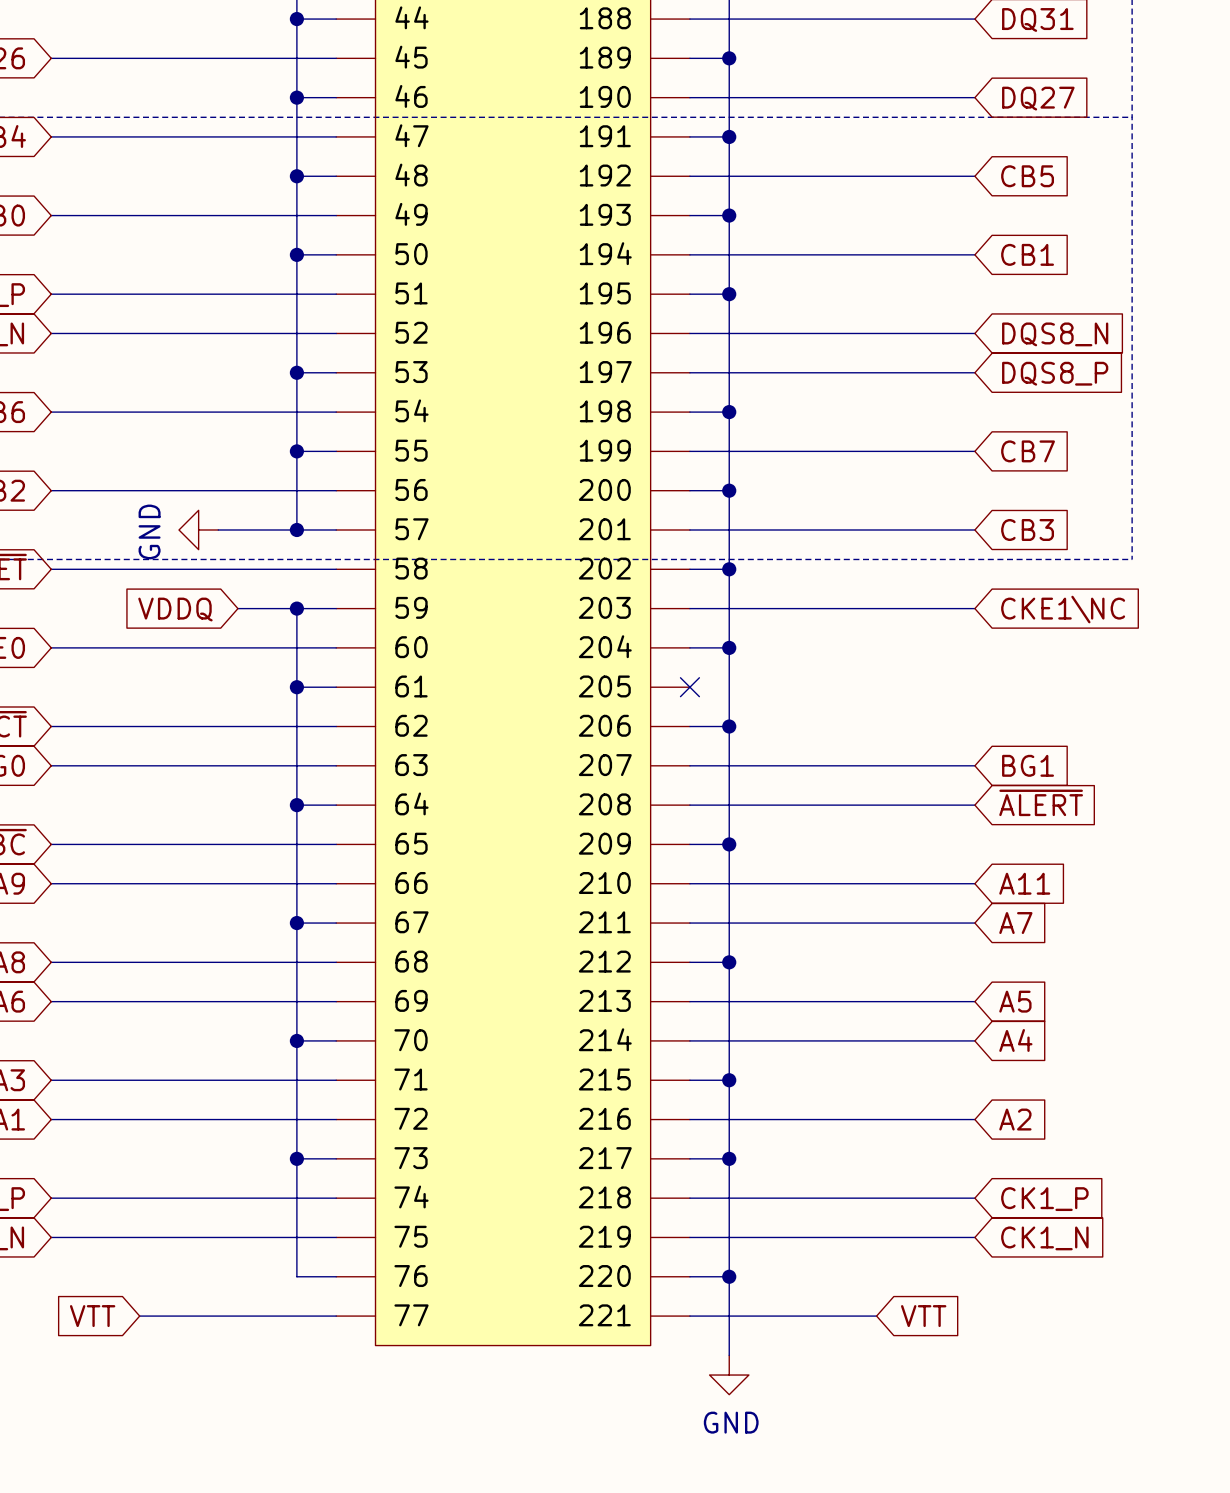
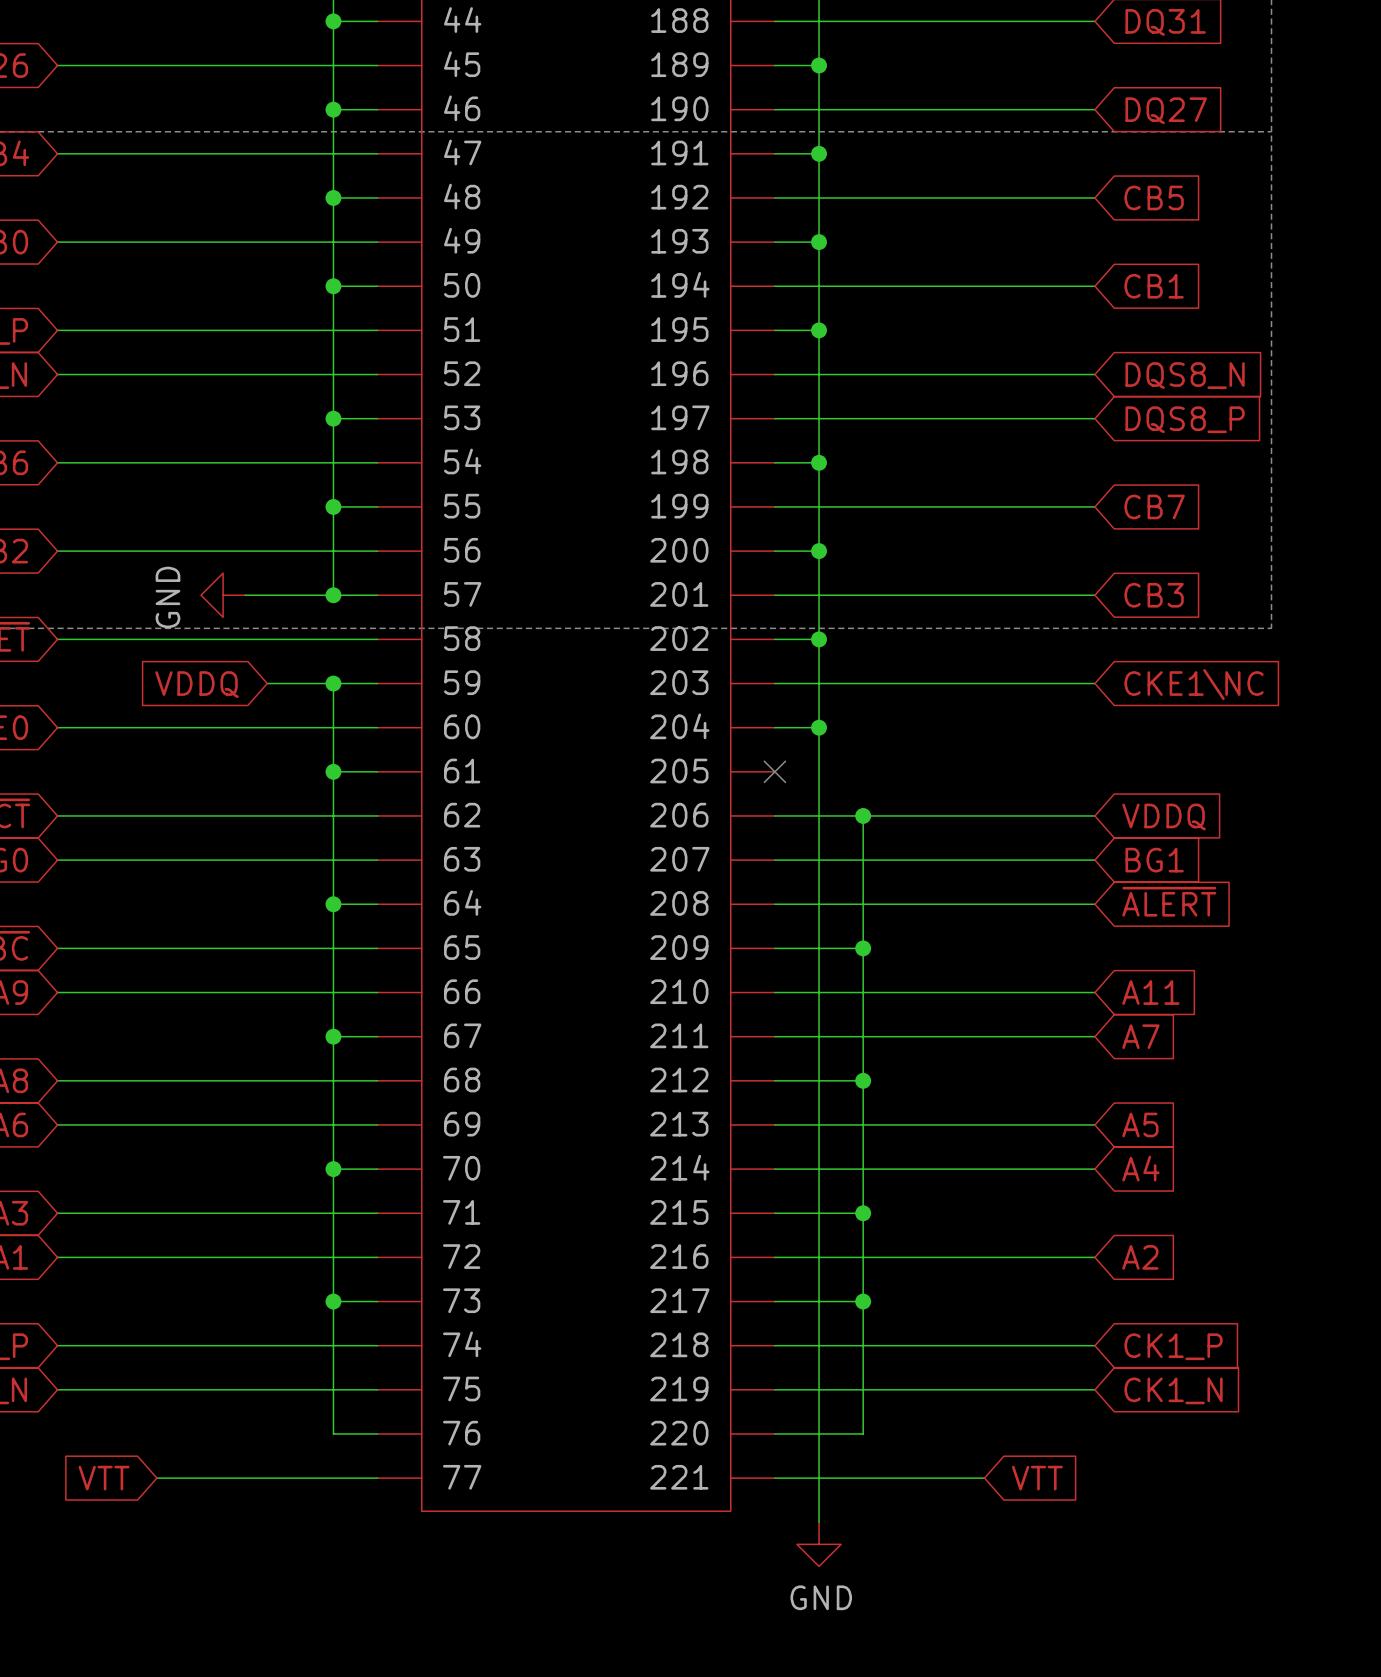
wire: none -> (819, 815) (1094, 815)
junction position: (729, 726) -> (863, 815)
wire: none -> (863, 815) (863, 1433) (819, 1433)
global label: none -> VDDQ (1164, 817)
wire: none -> (819, 948) (863, 948)
junction position: (729, 844) -> (863, 948)
wire: none -> (819, 1080) (863, 1080)
junction position: (729, 962) -> (863, 1080)
wire: none -> (819, 1213) (863, 1213)
junction position: (729, 1080) -> (863, 1213)
wire: none -> (819, 1301) (863, 1301)
junction position: (729, 1158) -> (863, 1301)
junction: (729, 1276) -> none

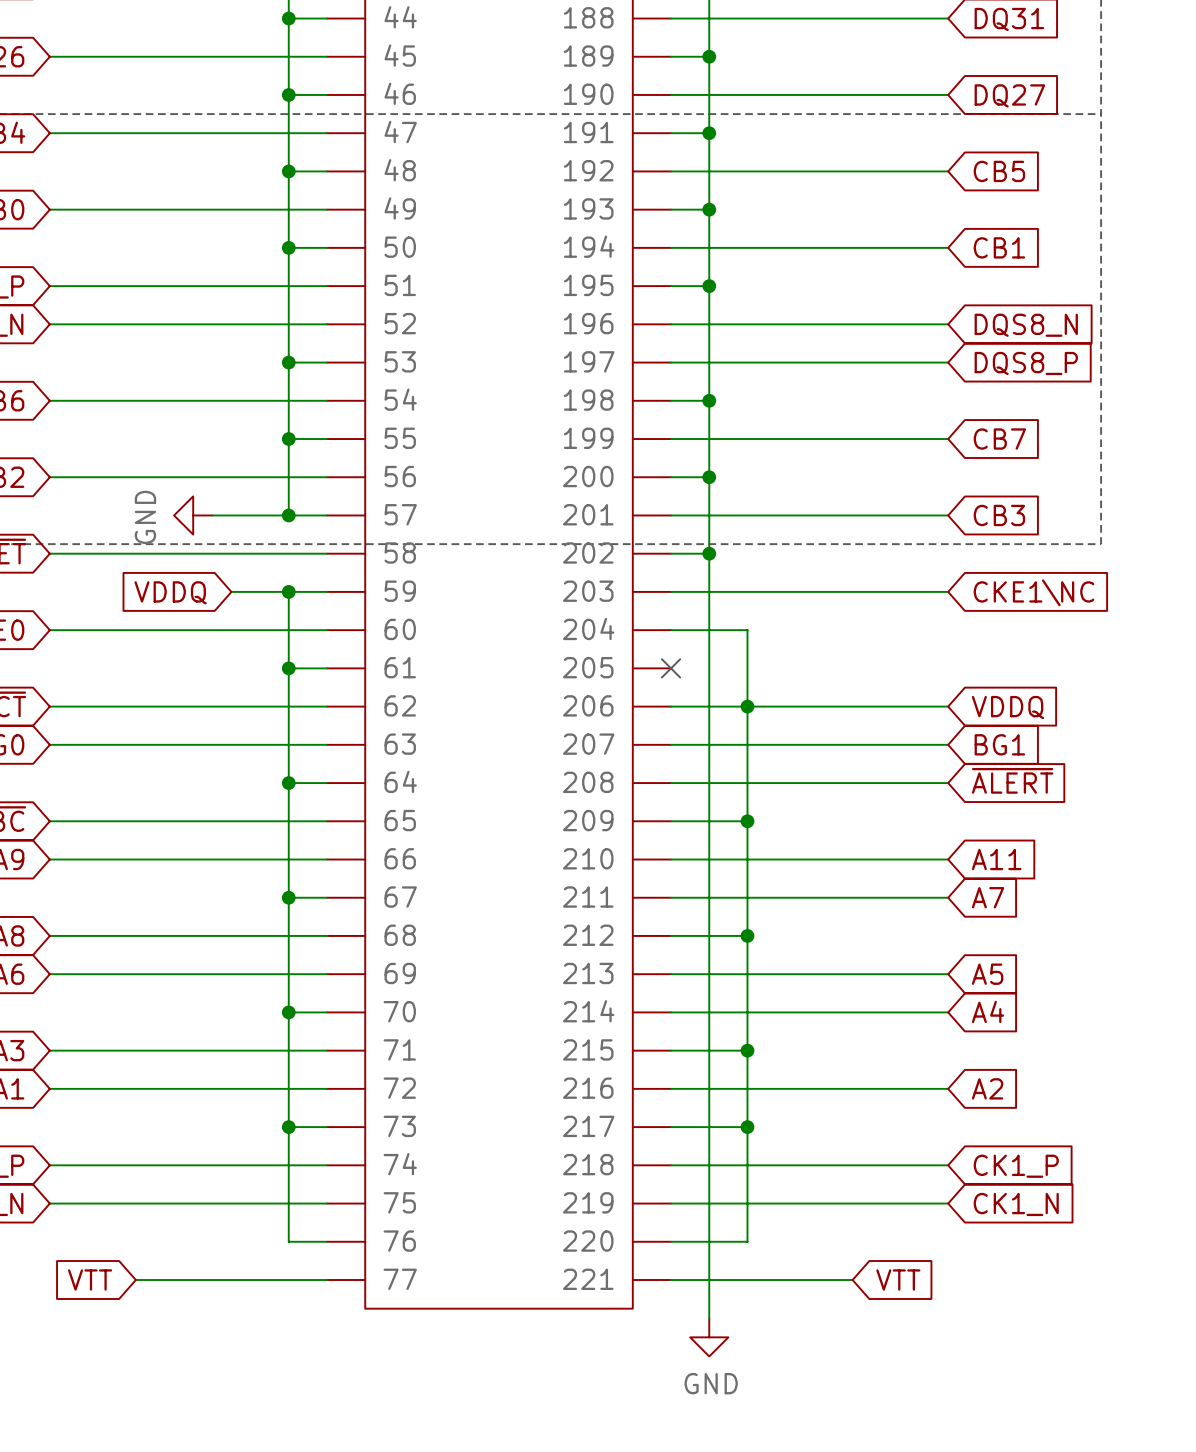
wire: none -> (709, 630) (747, 630) (747, 706)
junction: (819, 727) -> none

